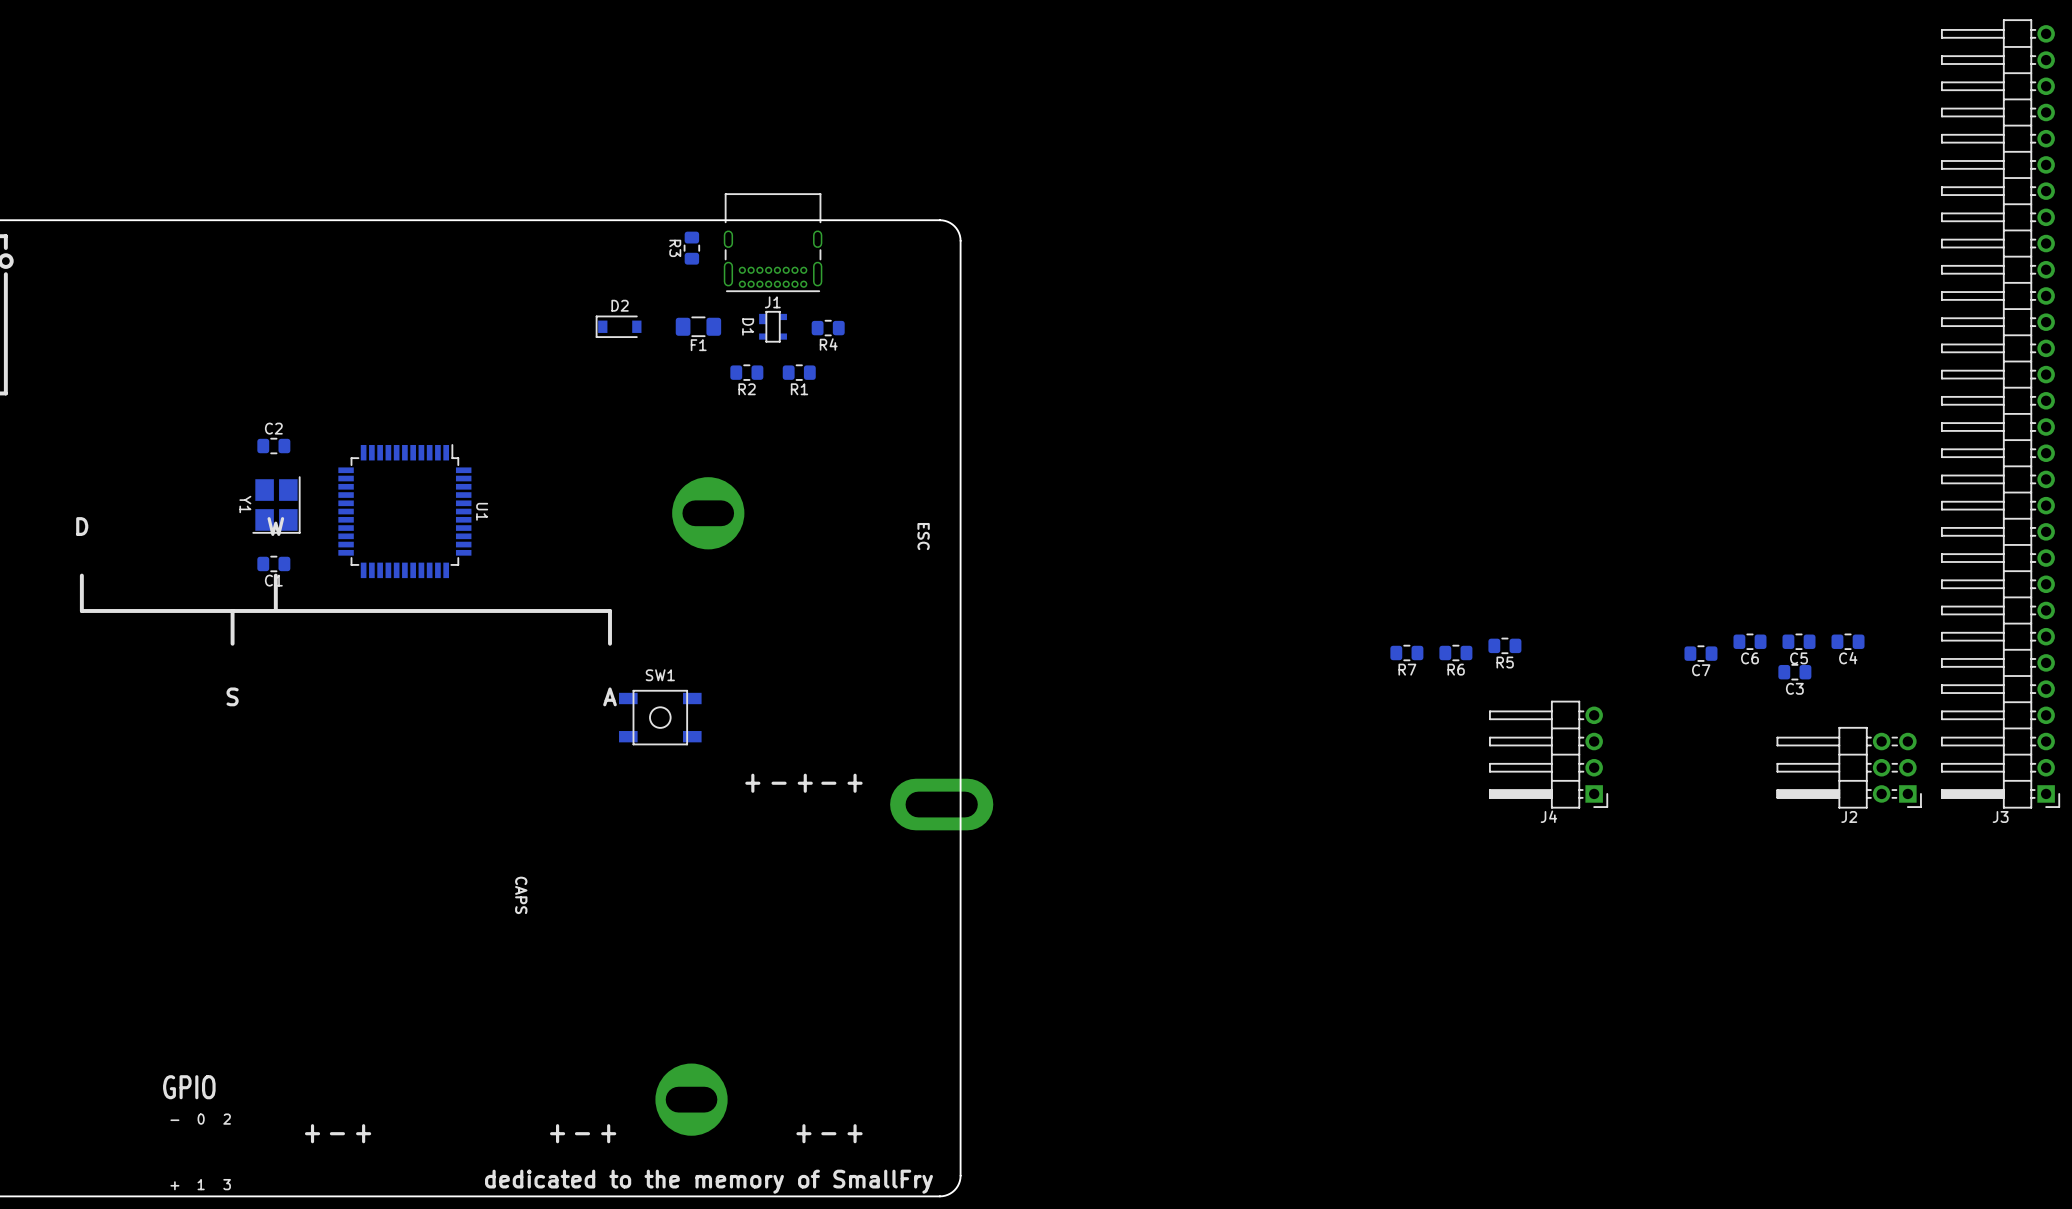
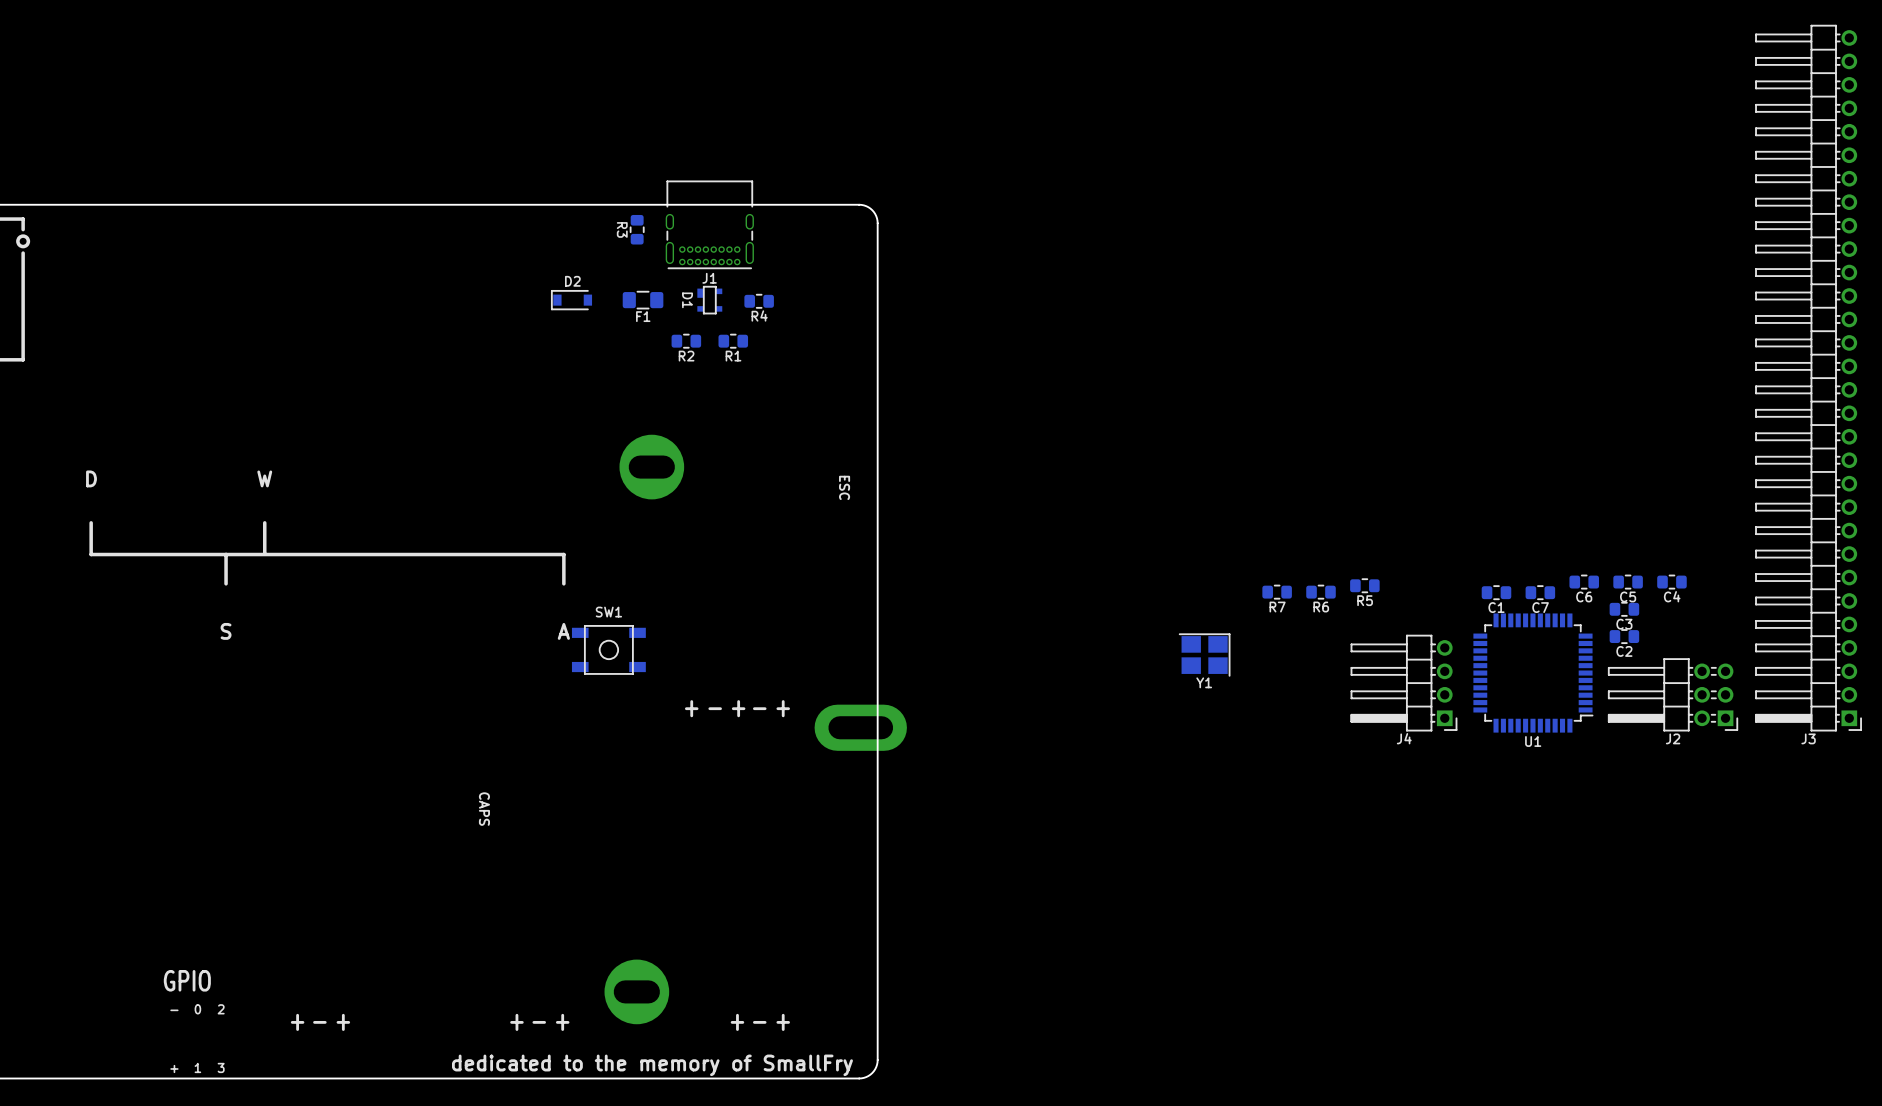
C2 name position: C2 (273, 428) -> C2 (1624, 651)
C2 position: (273, 446) -> (1624, 636)
Y1 rotation: 0° (276, 504) -> 90° counterclockwise (1204, 655)
Y1 position: (276, 504) -> (1204, 655)
U1 rotation: 0° (404, 511) -> 90° clockwise (1533, 673)
U1 position: (404, 511) -> (1533, 673)
C1 position: (273, 563) -> (1496, 592)

